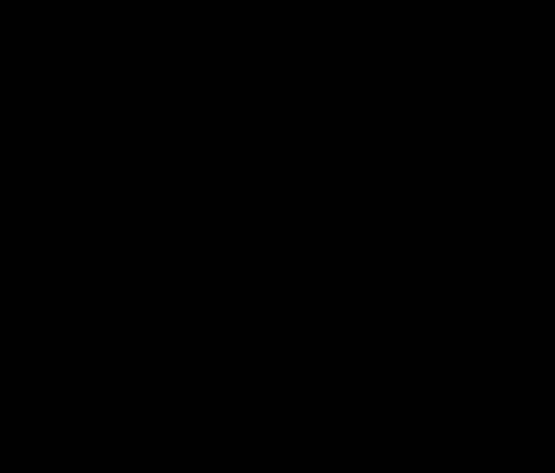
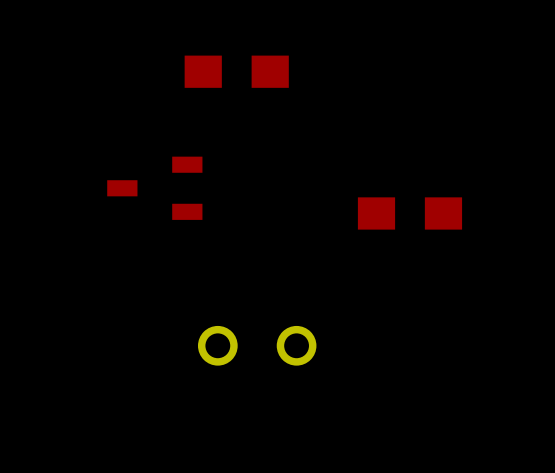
part: none -> (236, 71)
part: none -> (154, 188)
part: none -> (409, 213)
part: none -> (257, 345)

